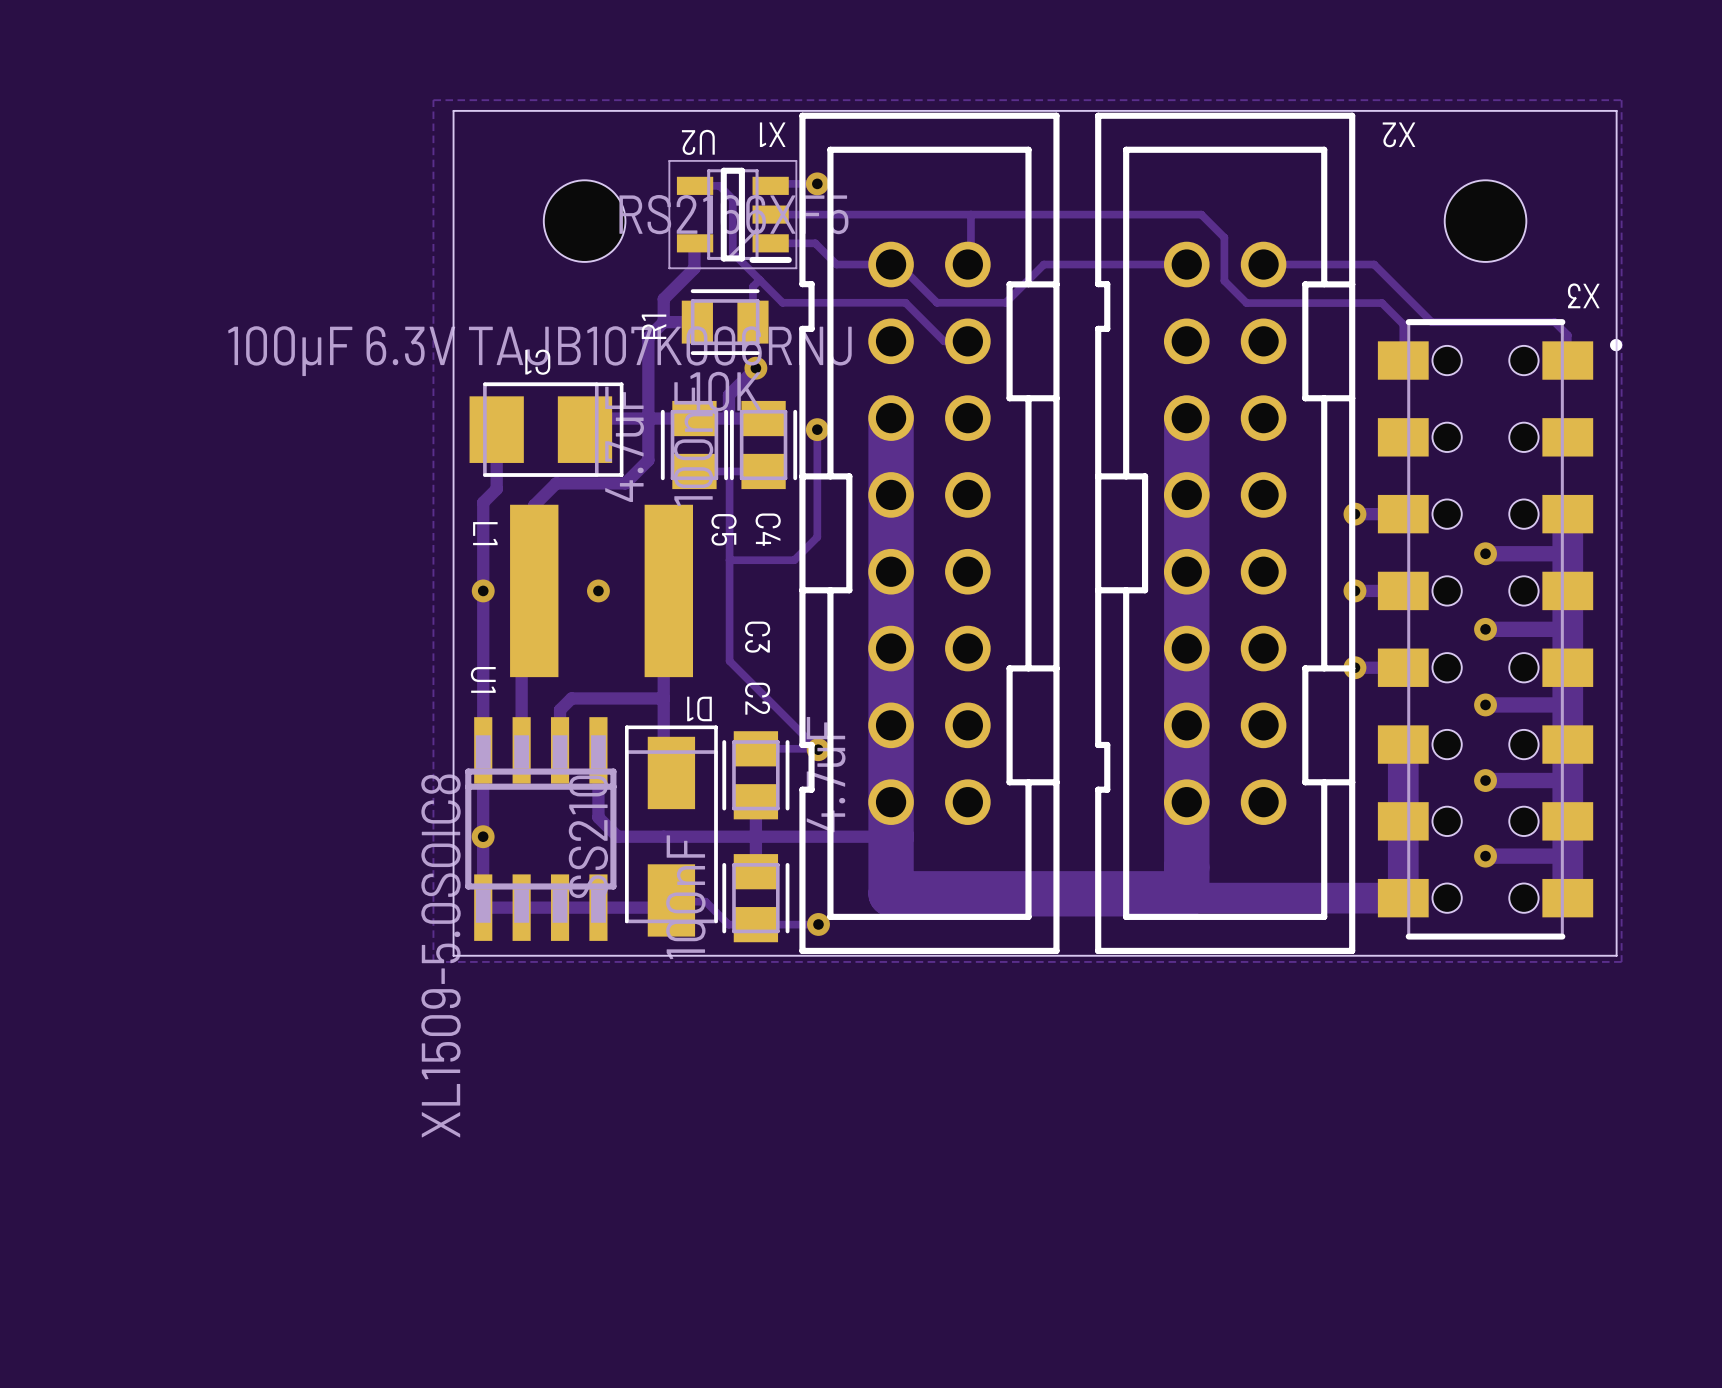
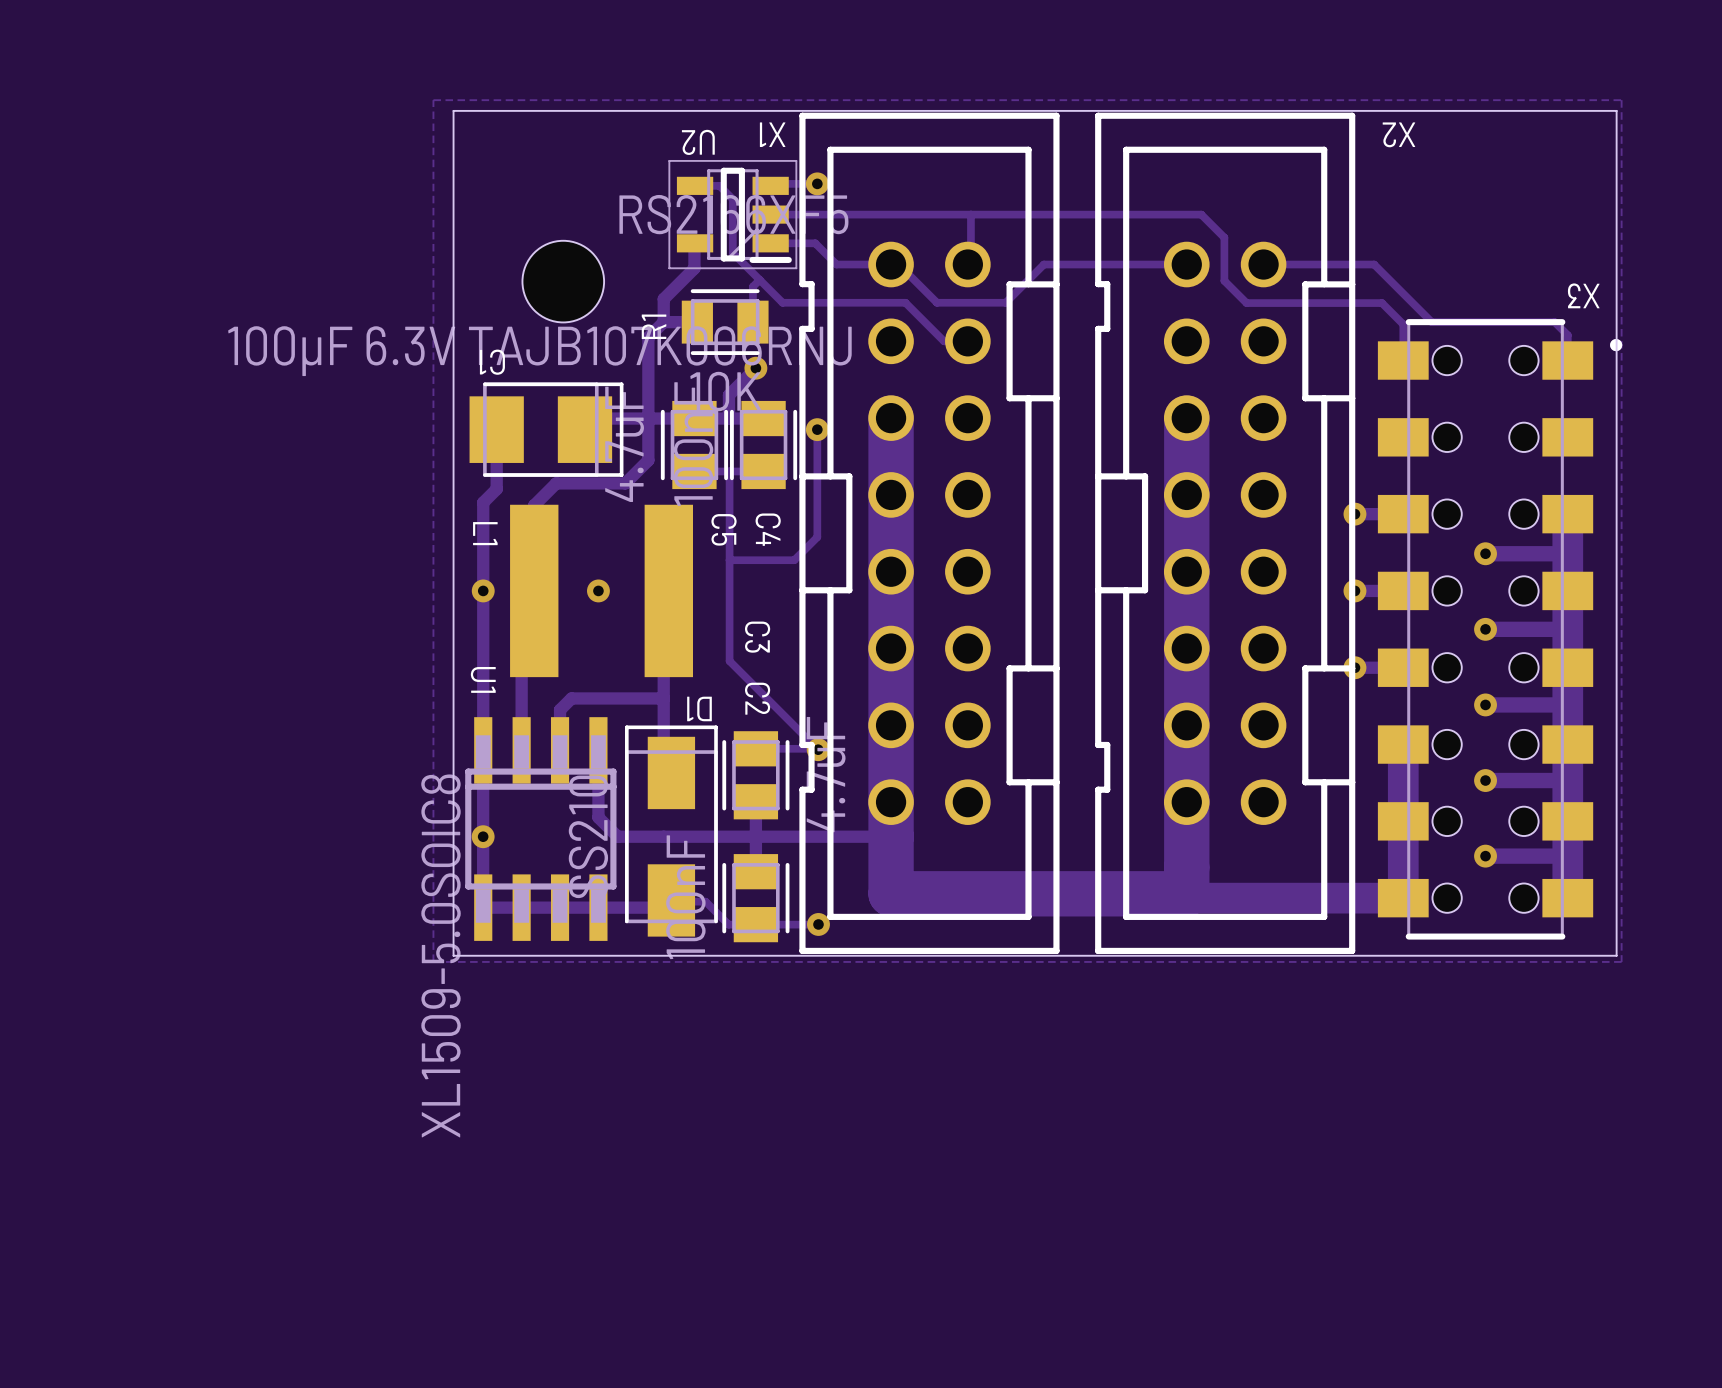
hole position: (584, 221) -> (563, 281)
hole: (1485, 221) -> none
C1 name position: C1 (537, 362) -> C1 (492, 362)

